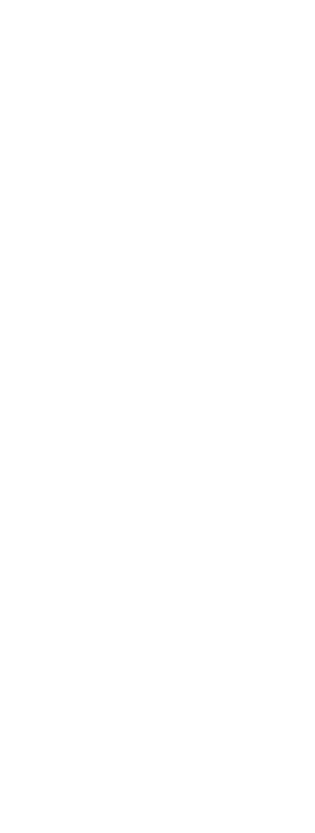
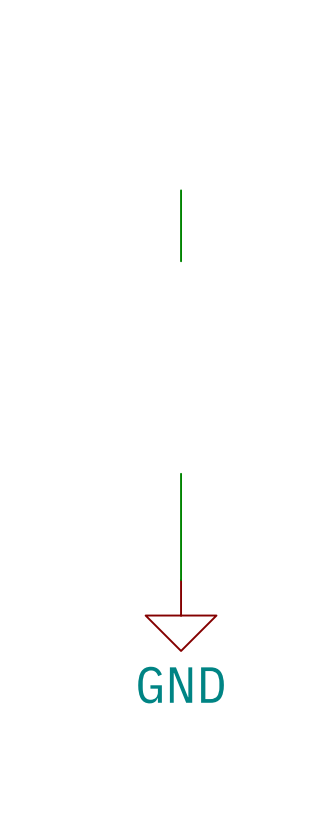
wire: none -> (181, 190) (181, 261)
wire: none -> (181, 473) (181, 580)
power symbol: none -> GND (181, 615)

